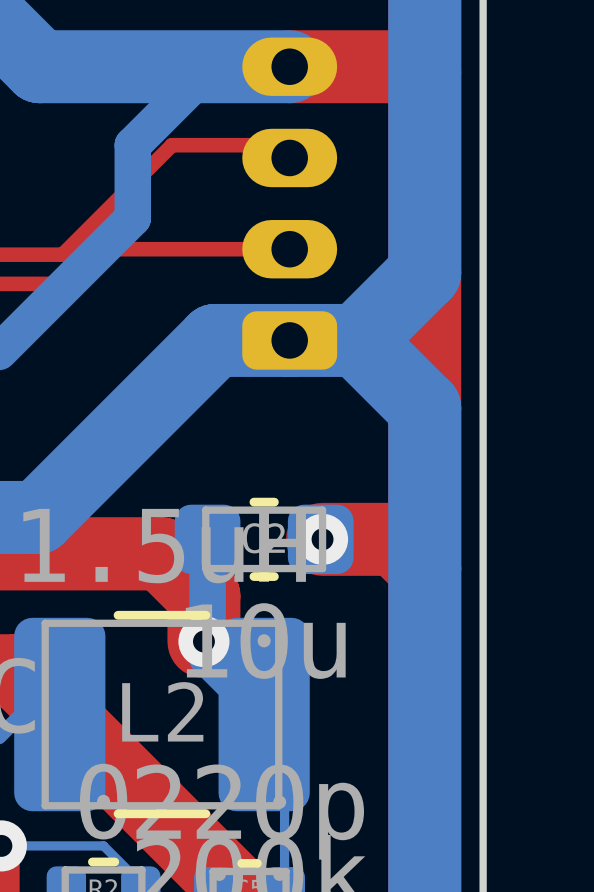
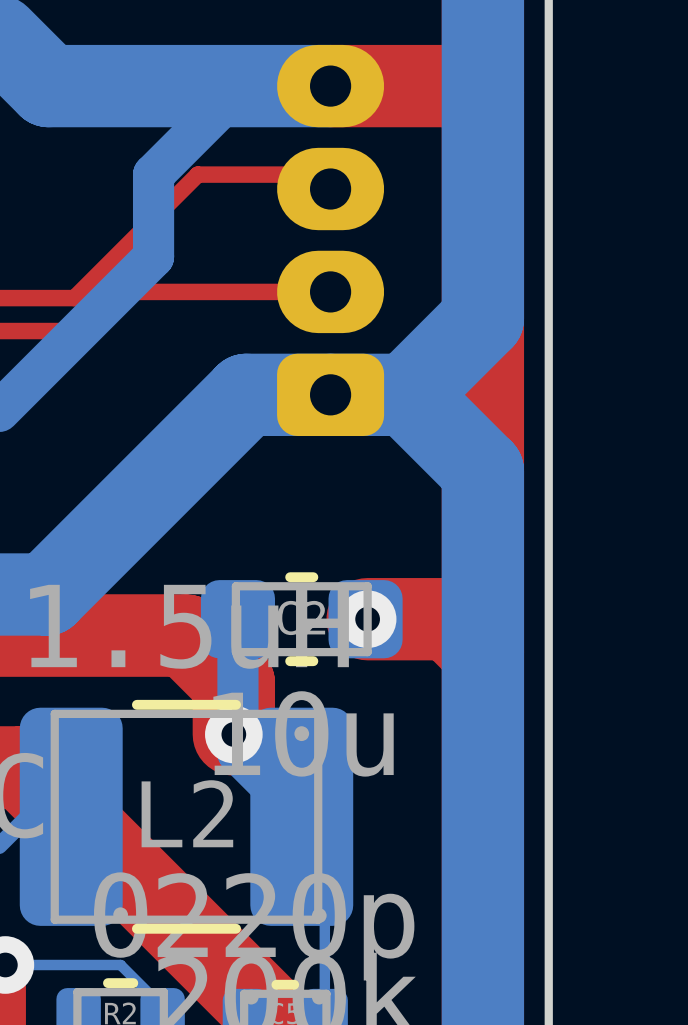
part footprint: [242, 37, 338, 370] -> [277, 44, 385, 437]

